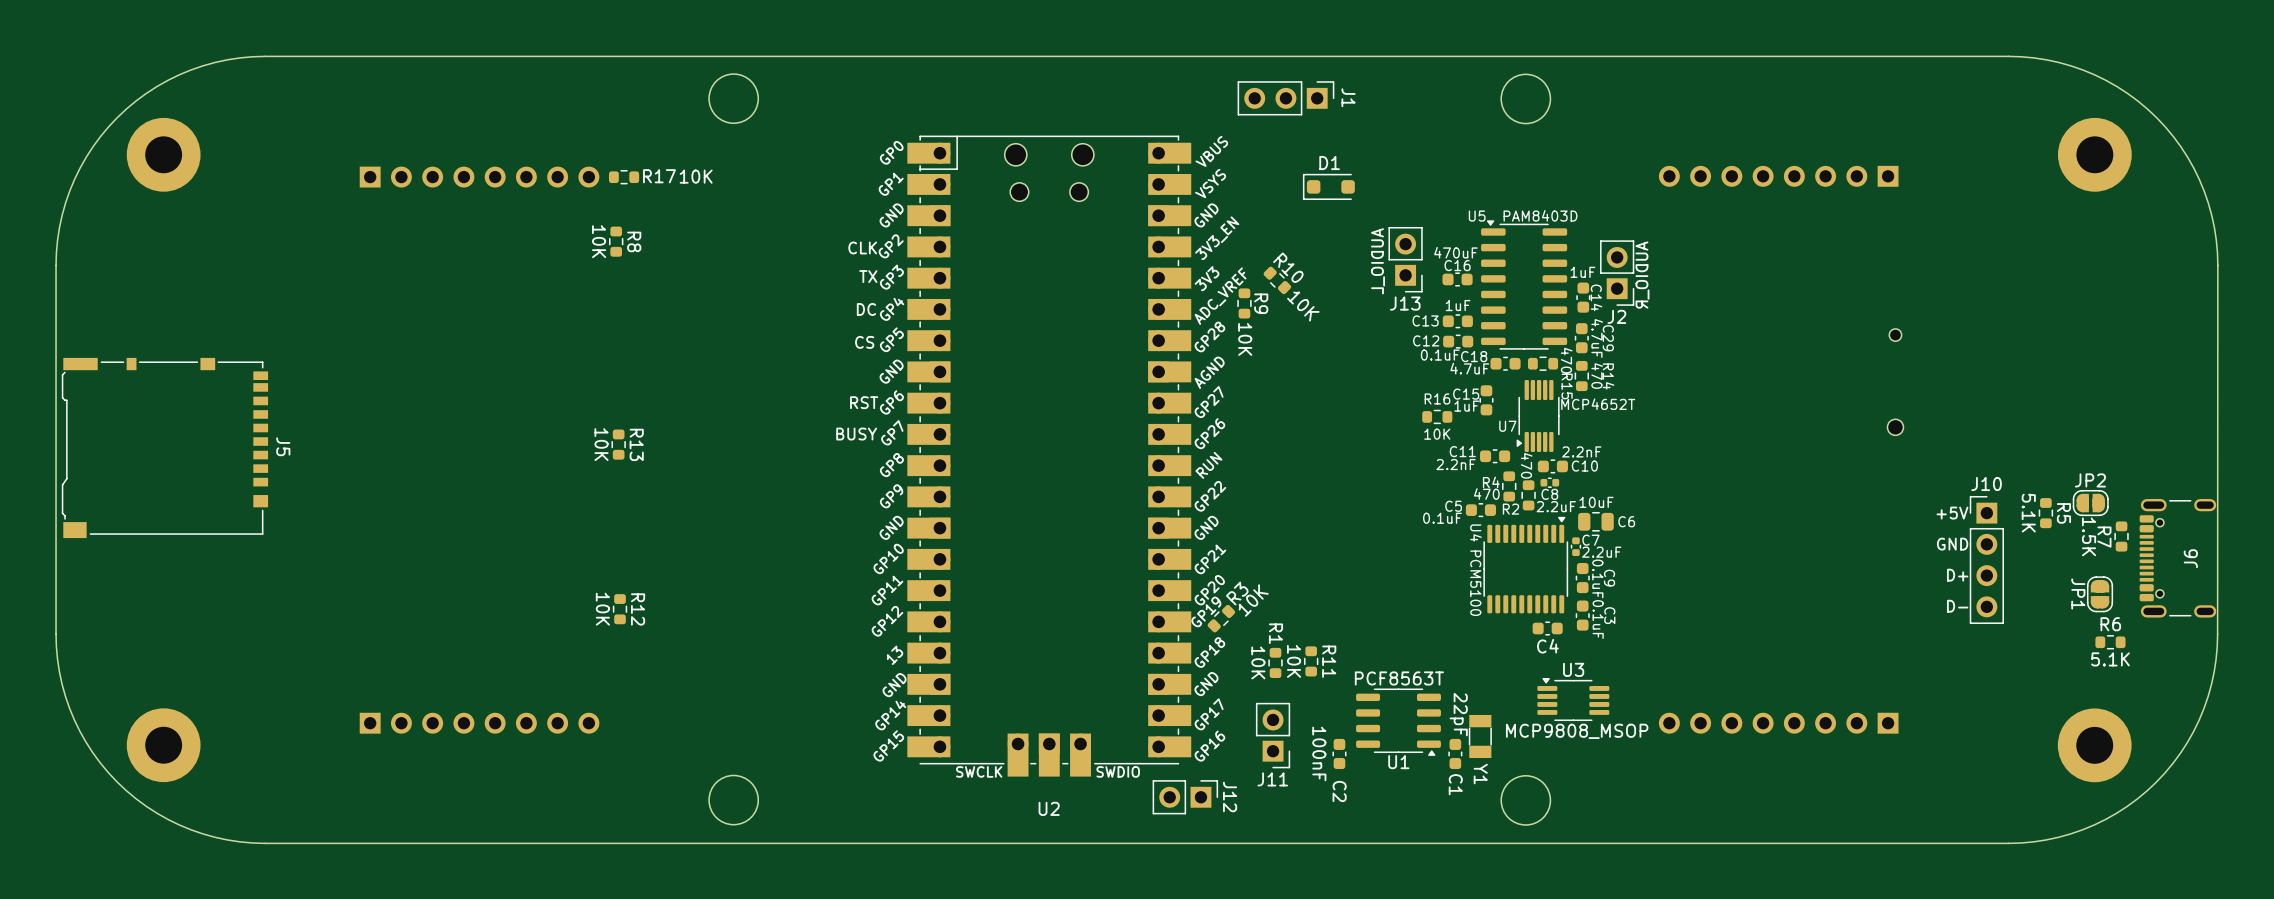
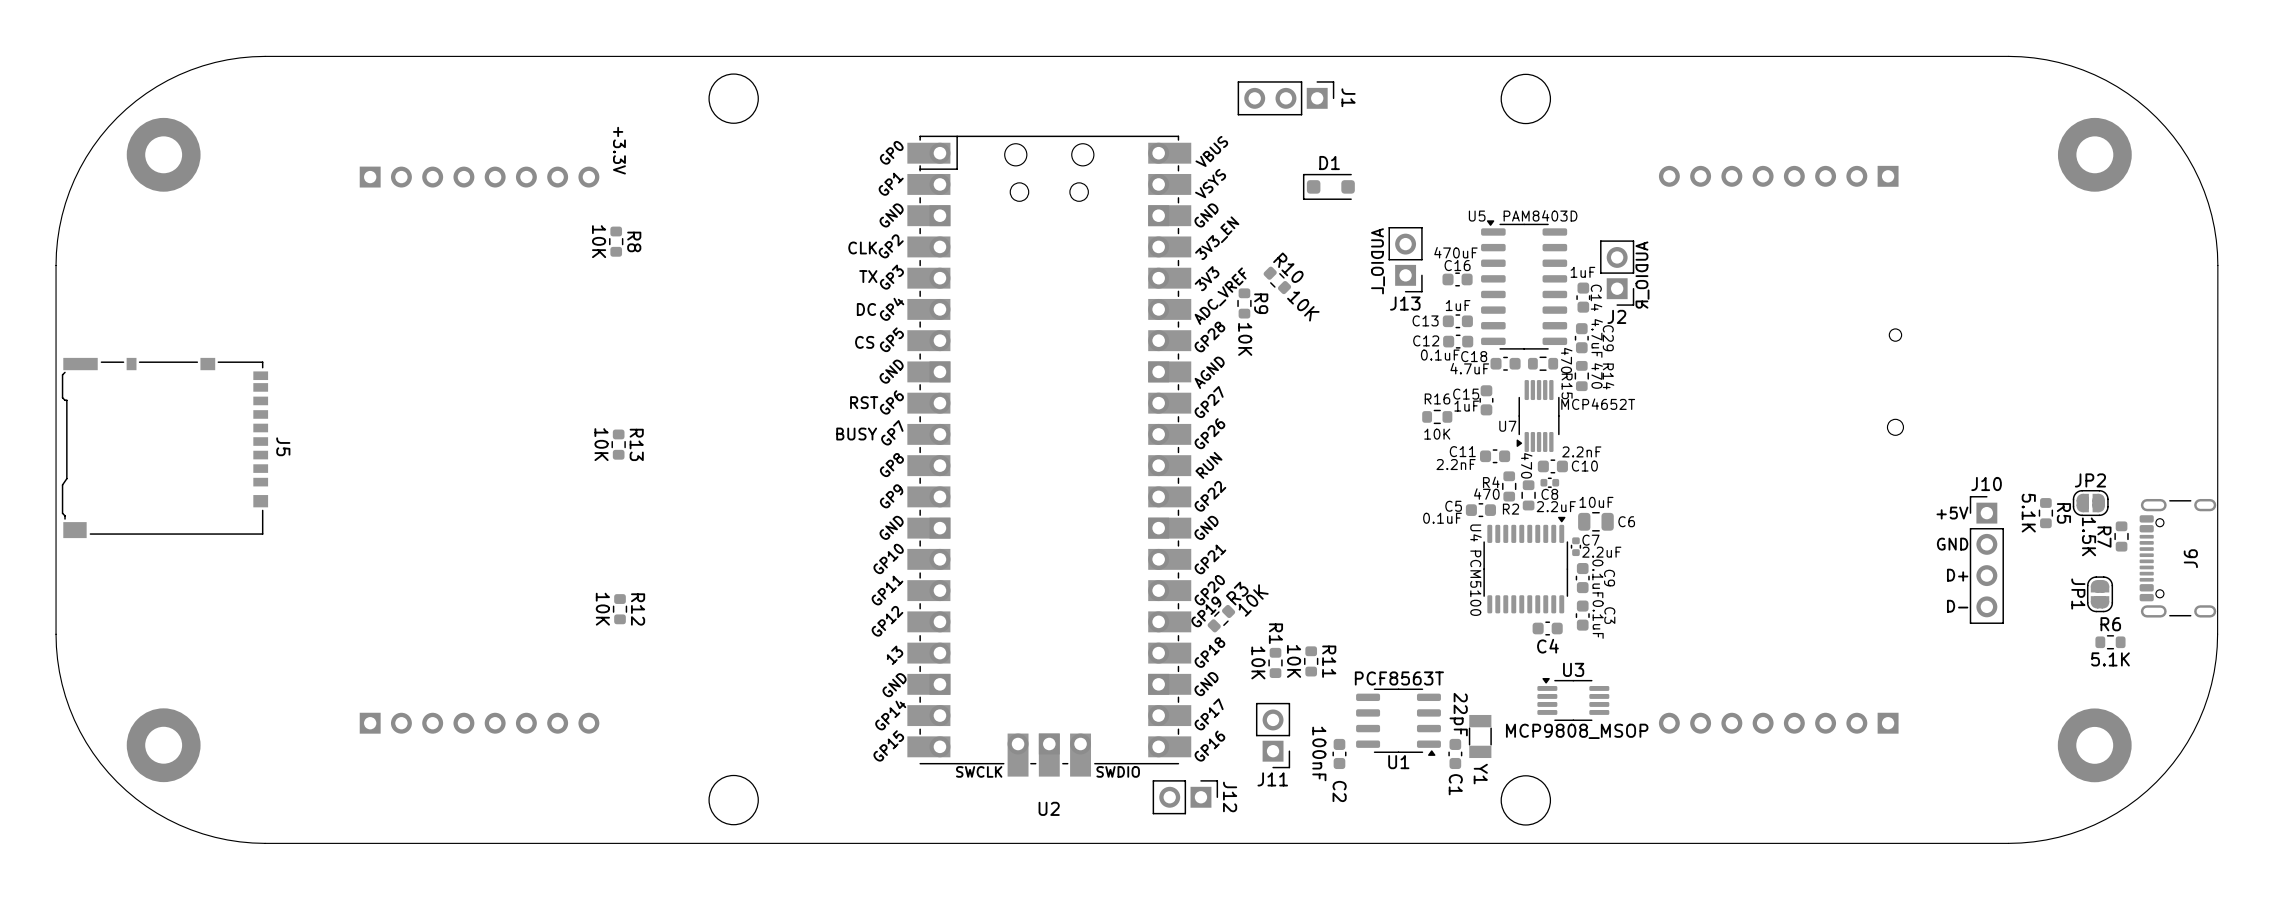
text: none -> +3.3V (619, 150)
R17: 10K (624, 177) -> none

